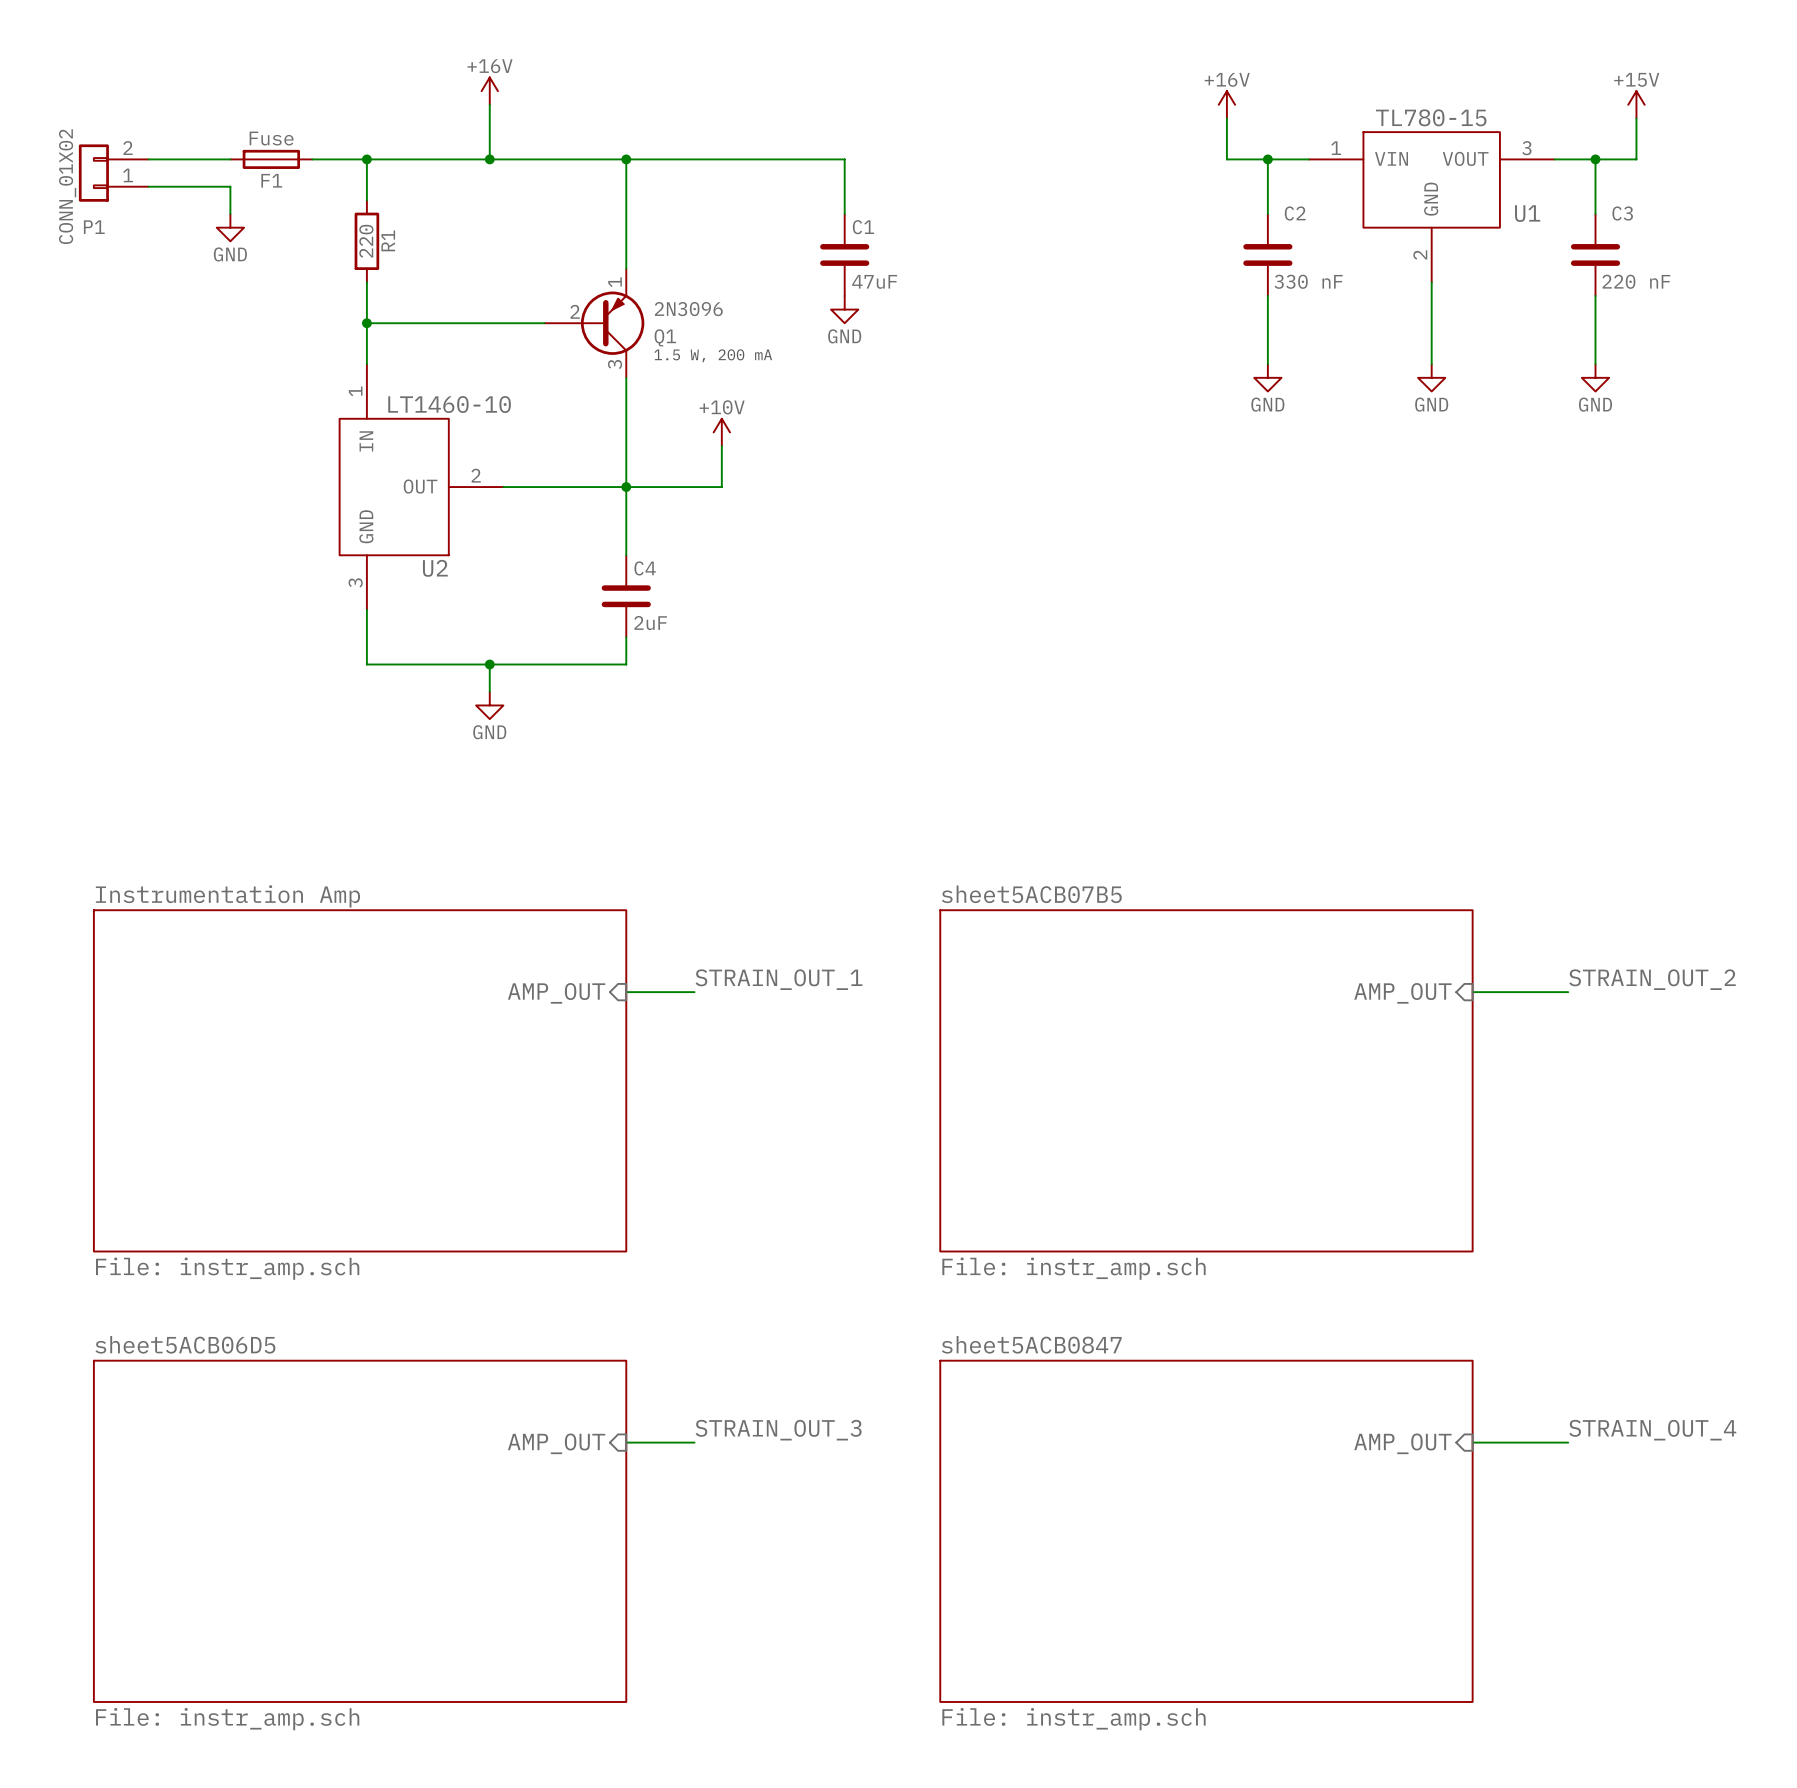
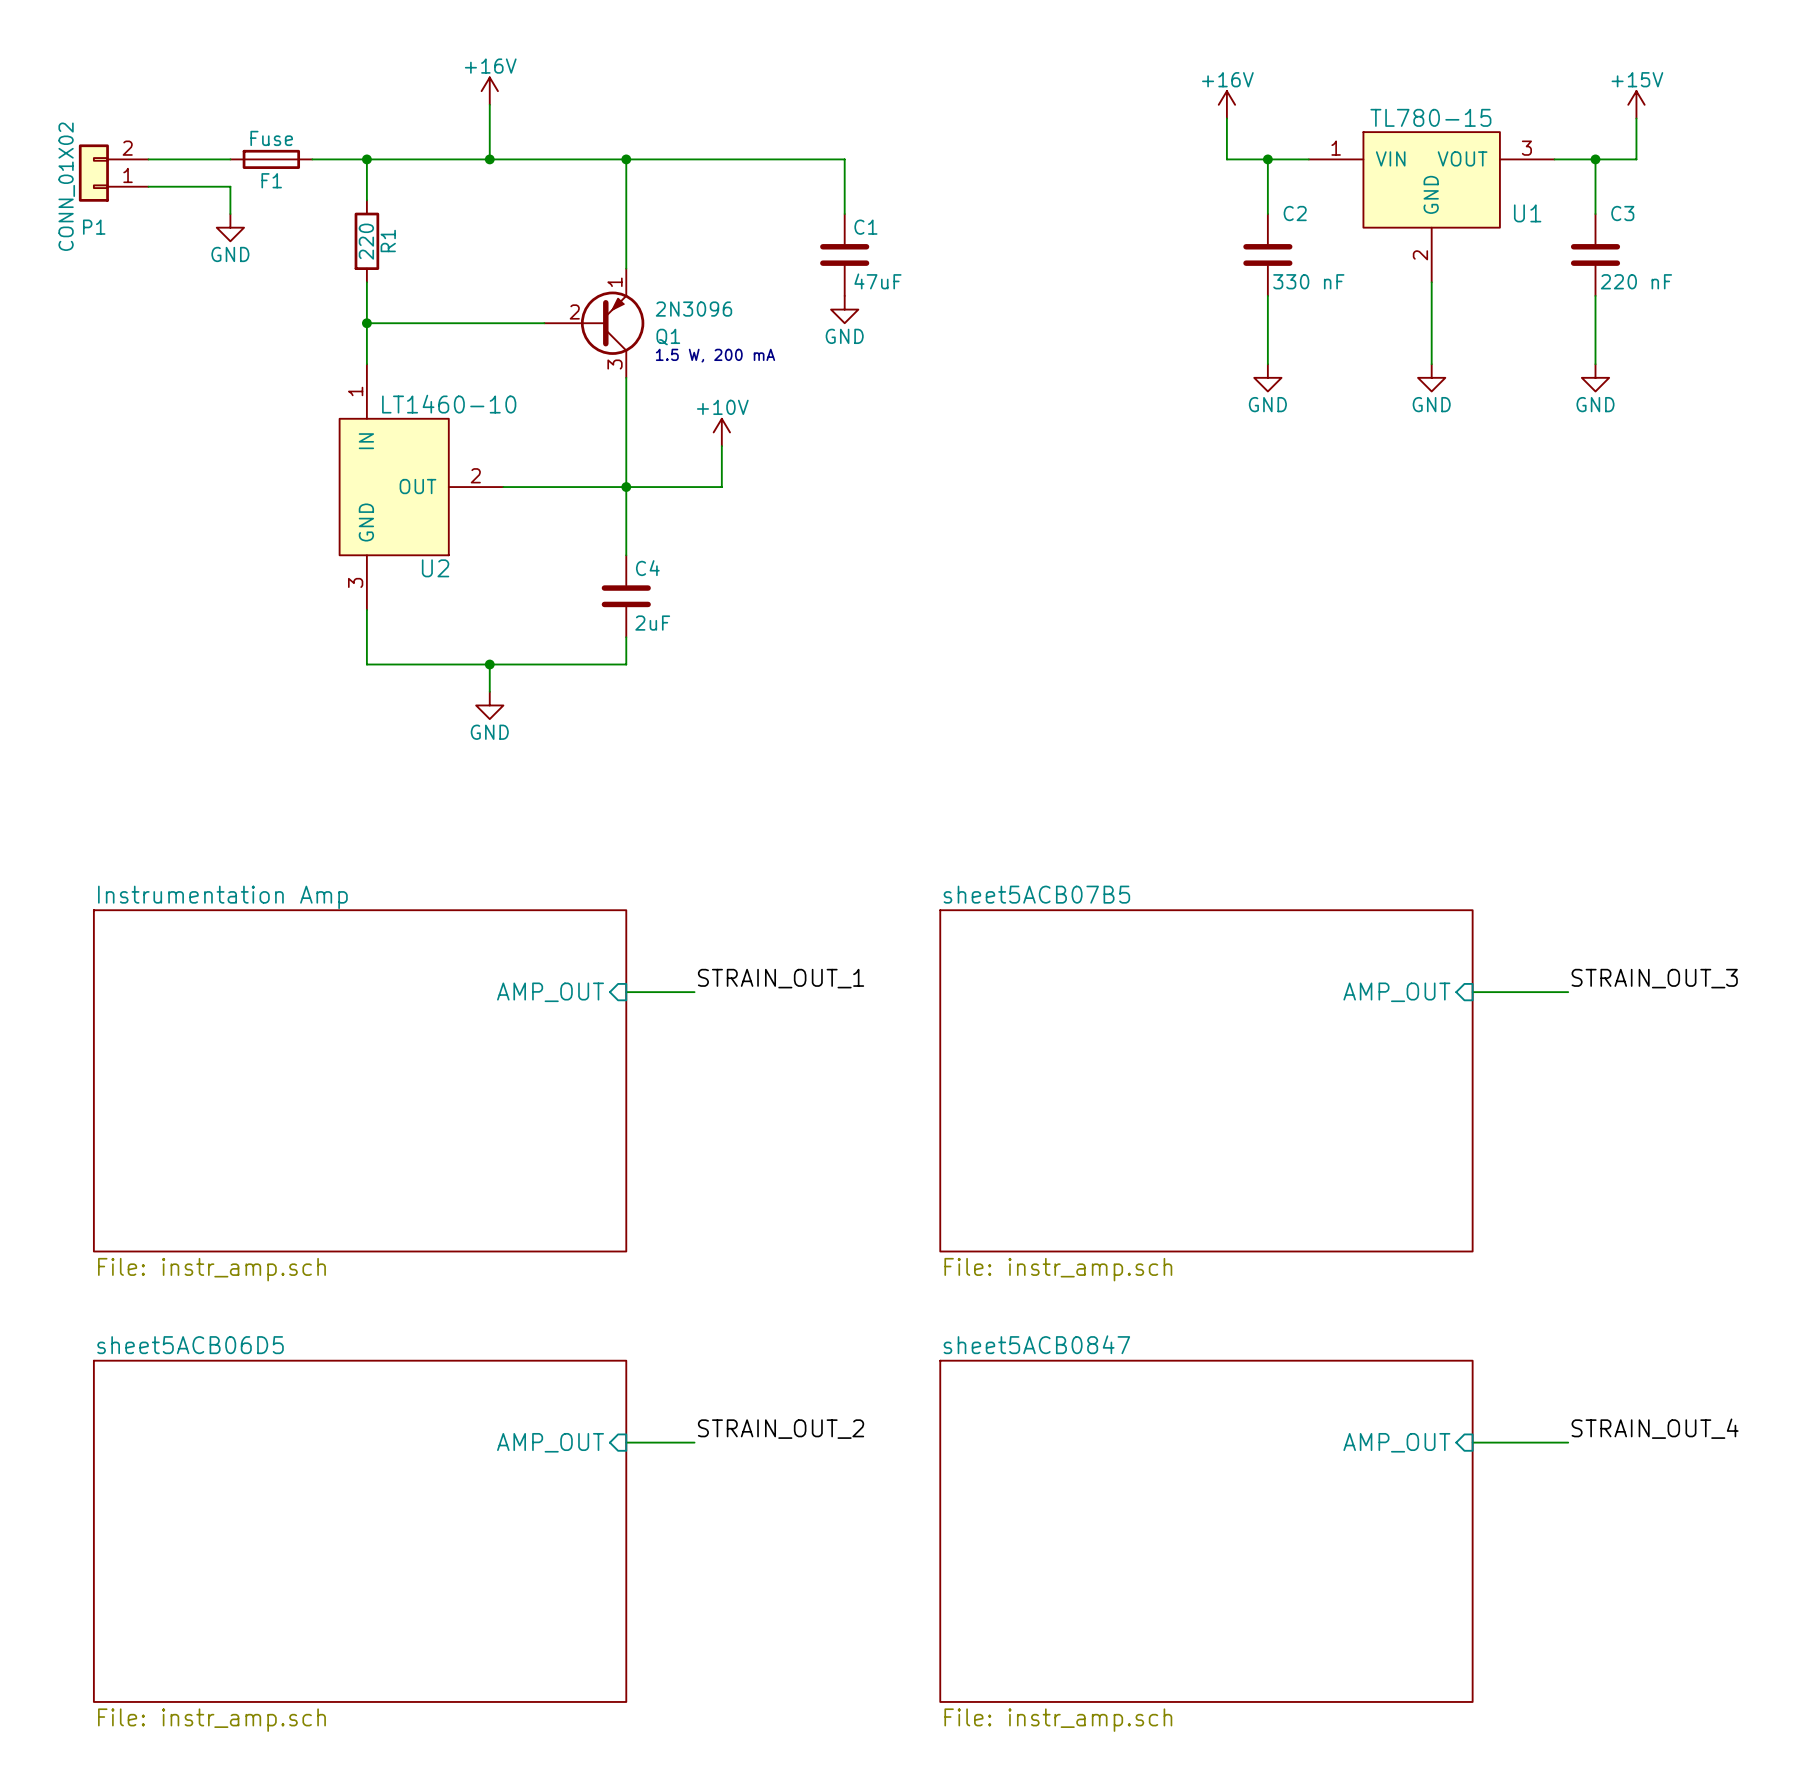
label: STRAIN_OUT_2 (1652, 979) -> STRAIN_OUT_3 (1654, 978)
label: STRAIN_OUT_3 (778, 1430) -> STRAIN_OUT_2 (781, 1429)

